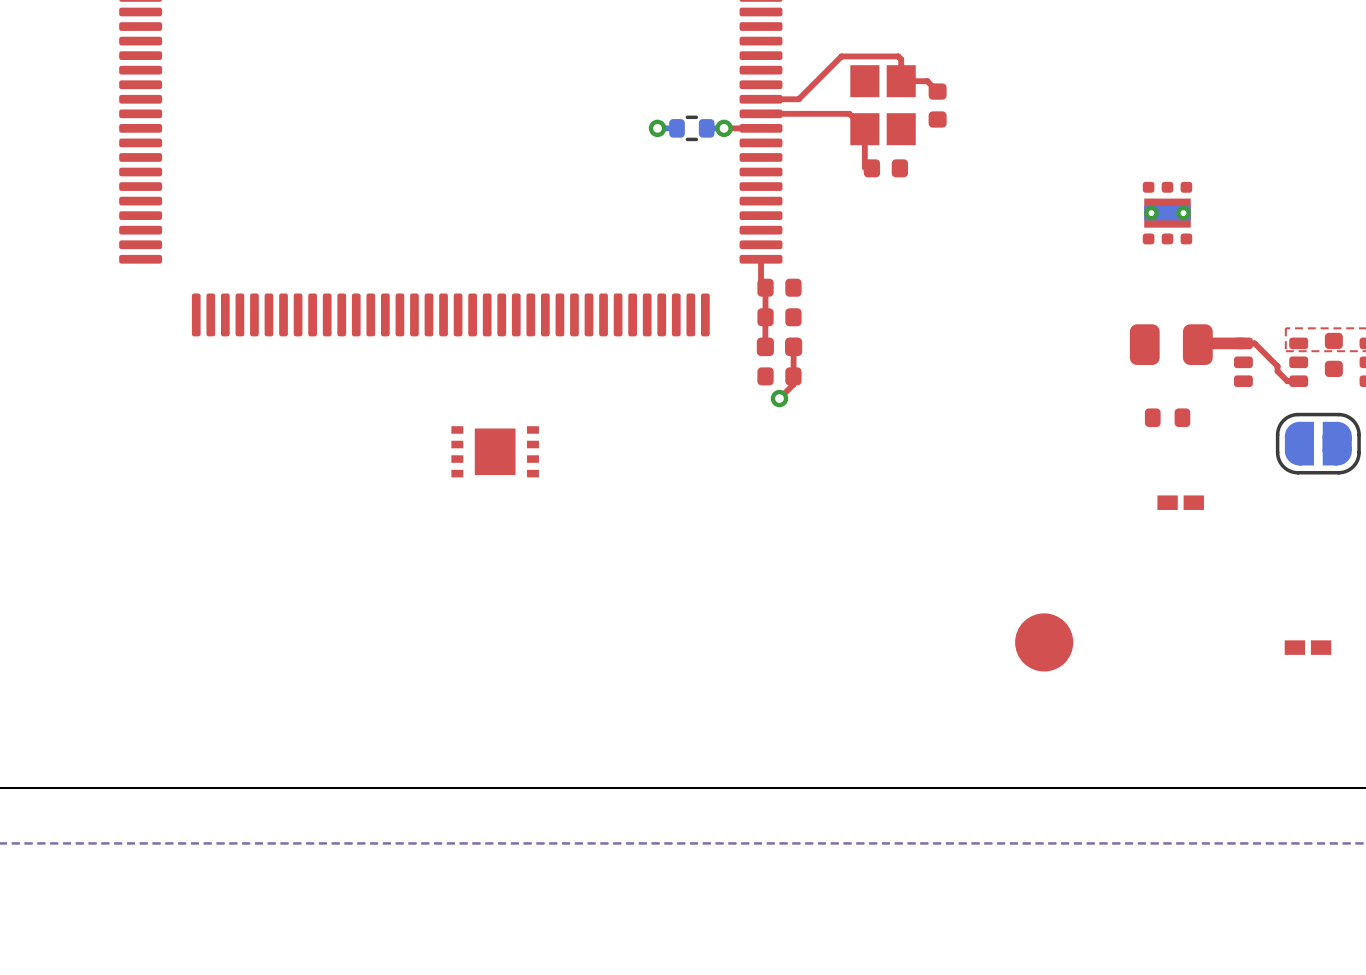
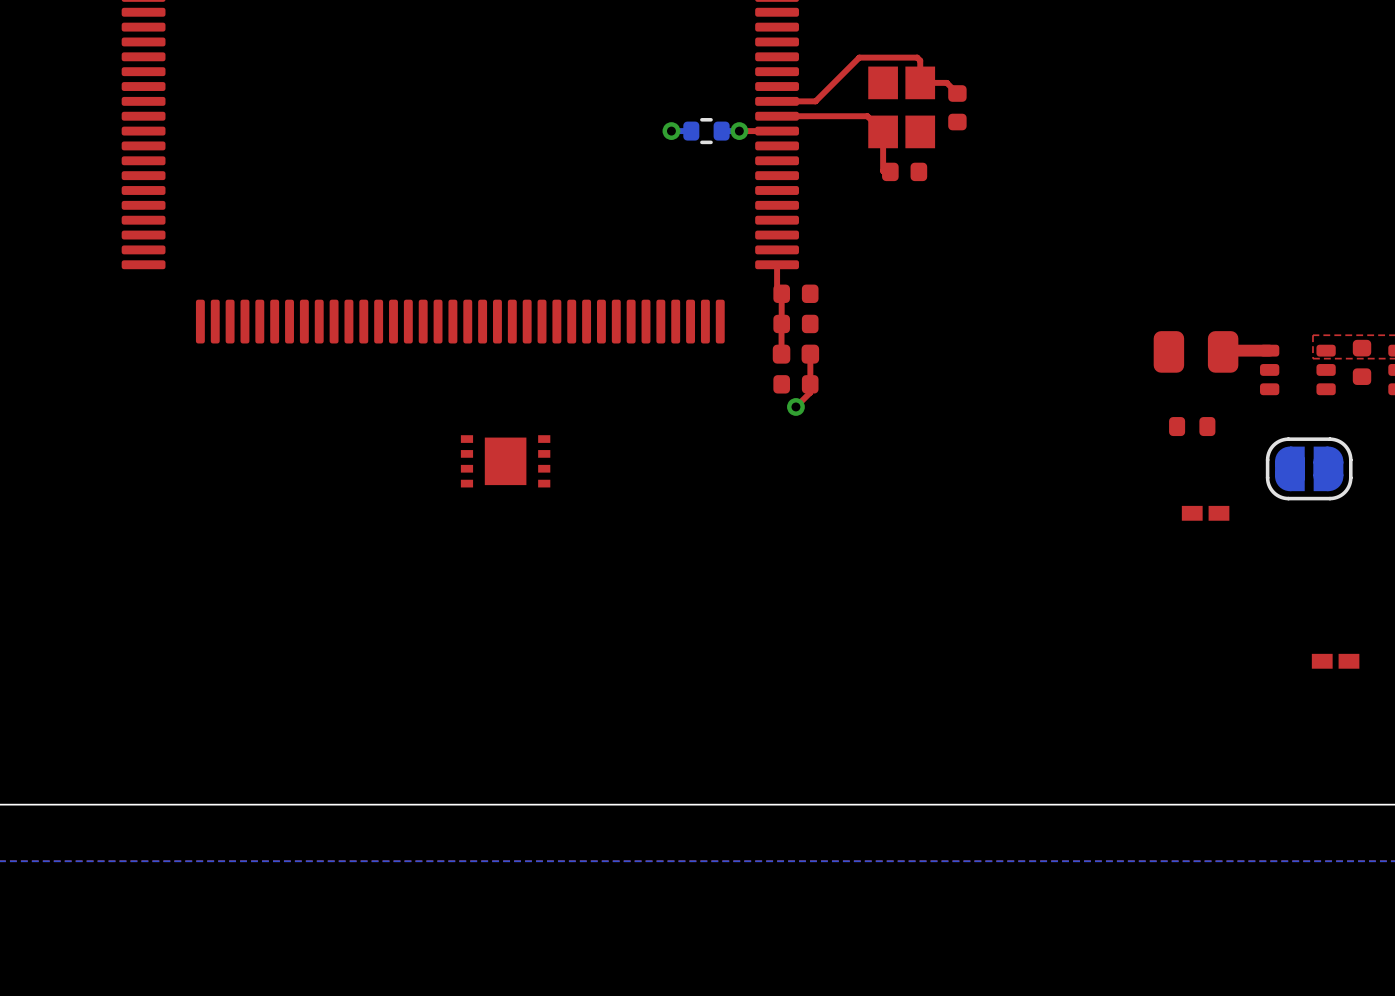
part: (1167, 213) -> none
top track: (1243, 343) (1254, 343) (1277, 366) (1277, 371) (1287, 381) (1298, 381) -> none
part position: (1318, 443) -> (1309, 468)
part: (1044, 642) -> none

